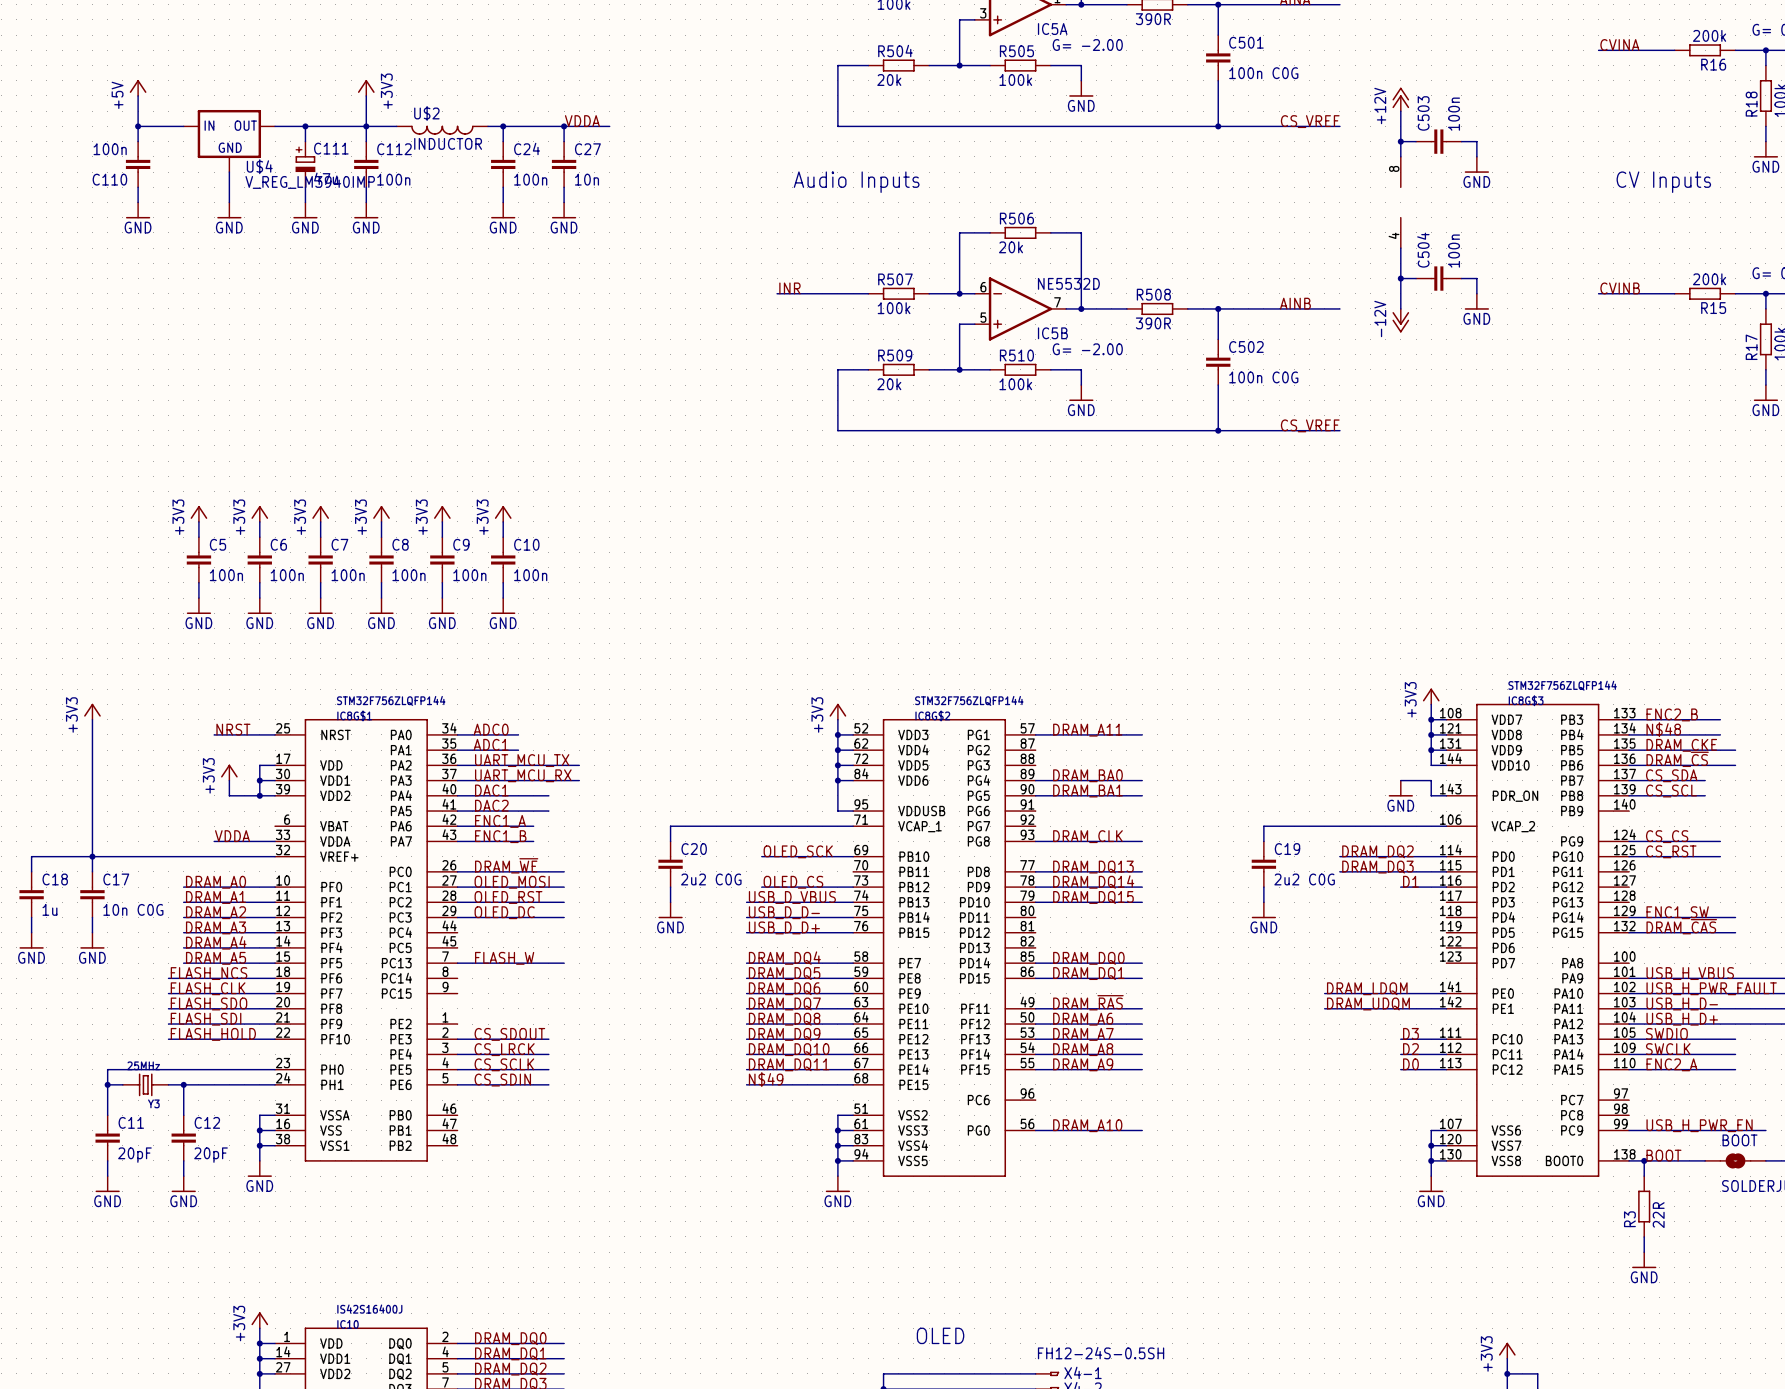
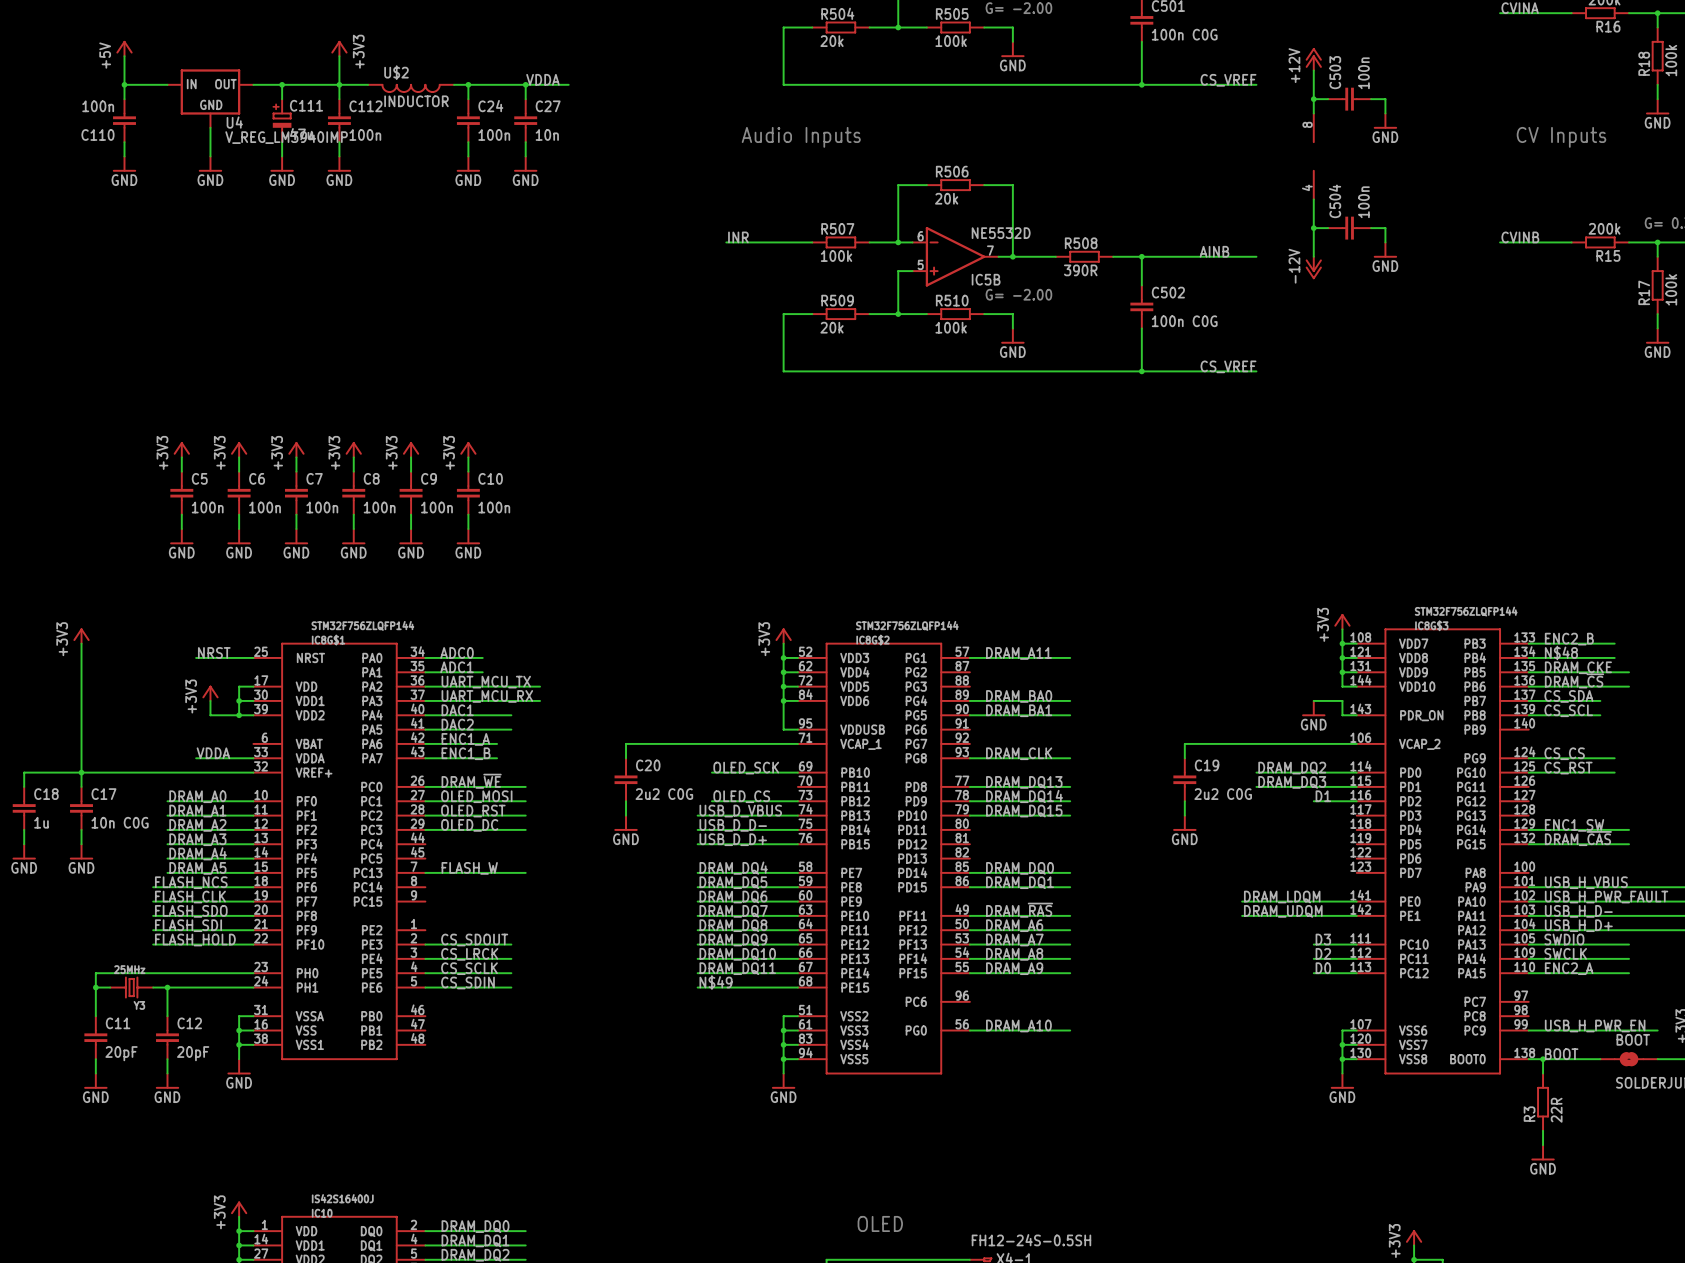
U$4 name: U$4 (259, 166) -> U4 (234, 122)

